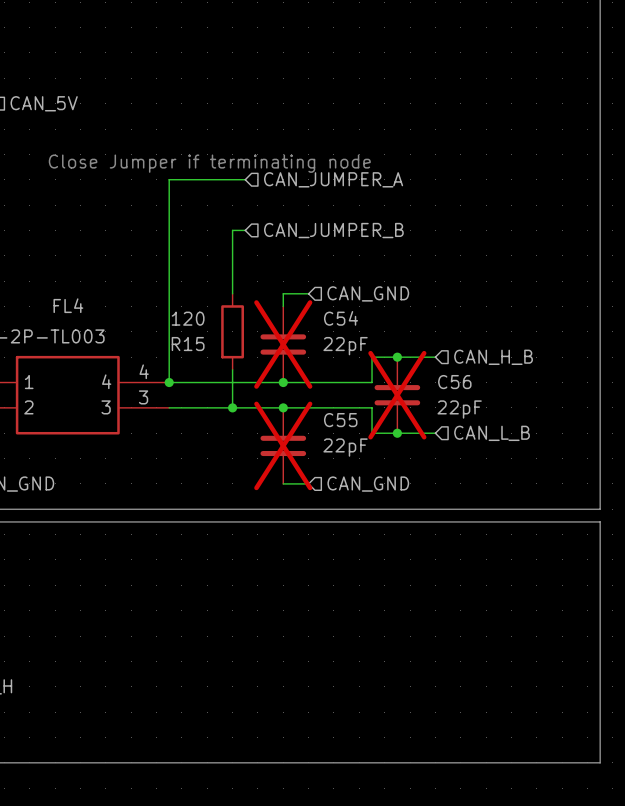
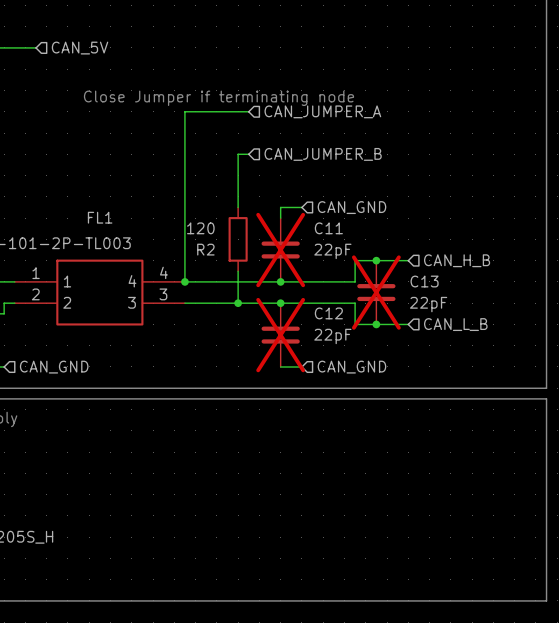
FL4 name: FL4 (68, 305) -> FL1 (100, 217)
C54 name: C54 (341, 318) -> C11 (328, 228)
R15 name: R15 (188, 344) -> R2 (205, 249)
C56 name: C56 (454, 382) -> C13 (424, 281)
C55 name: C55 (340, 420) -> C12 (328, 313)

